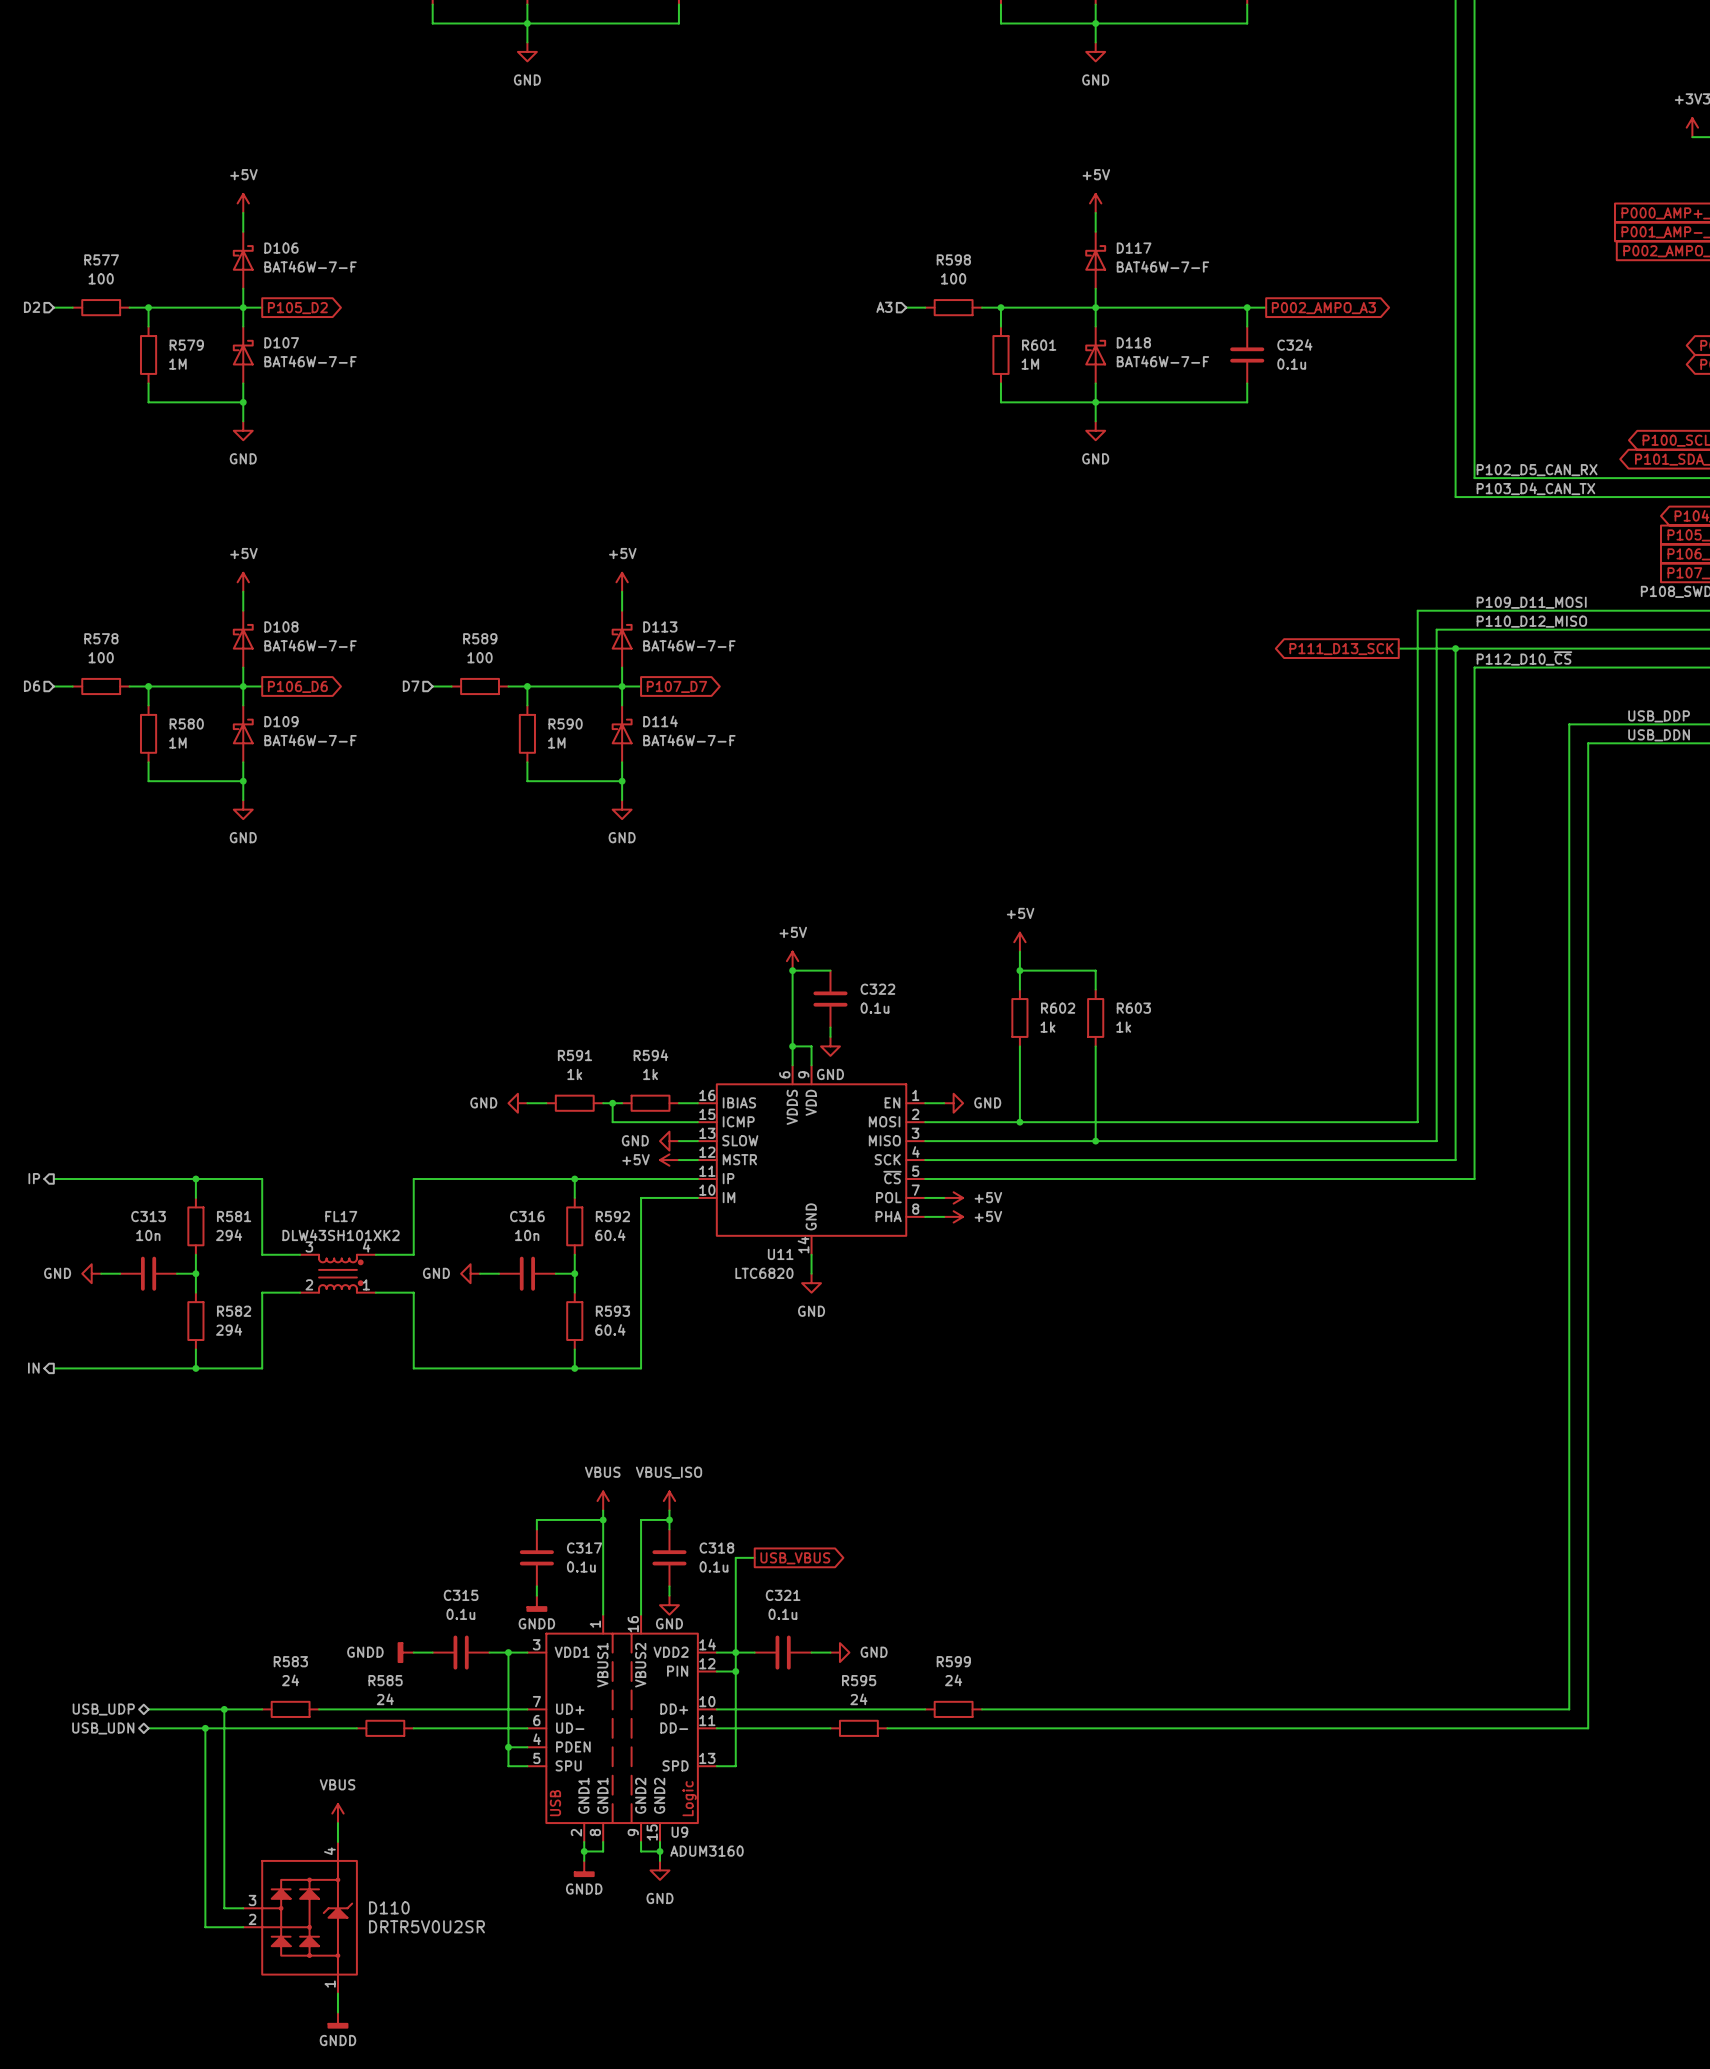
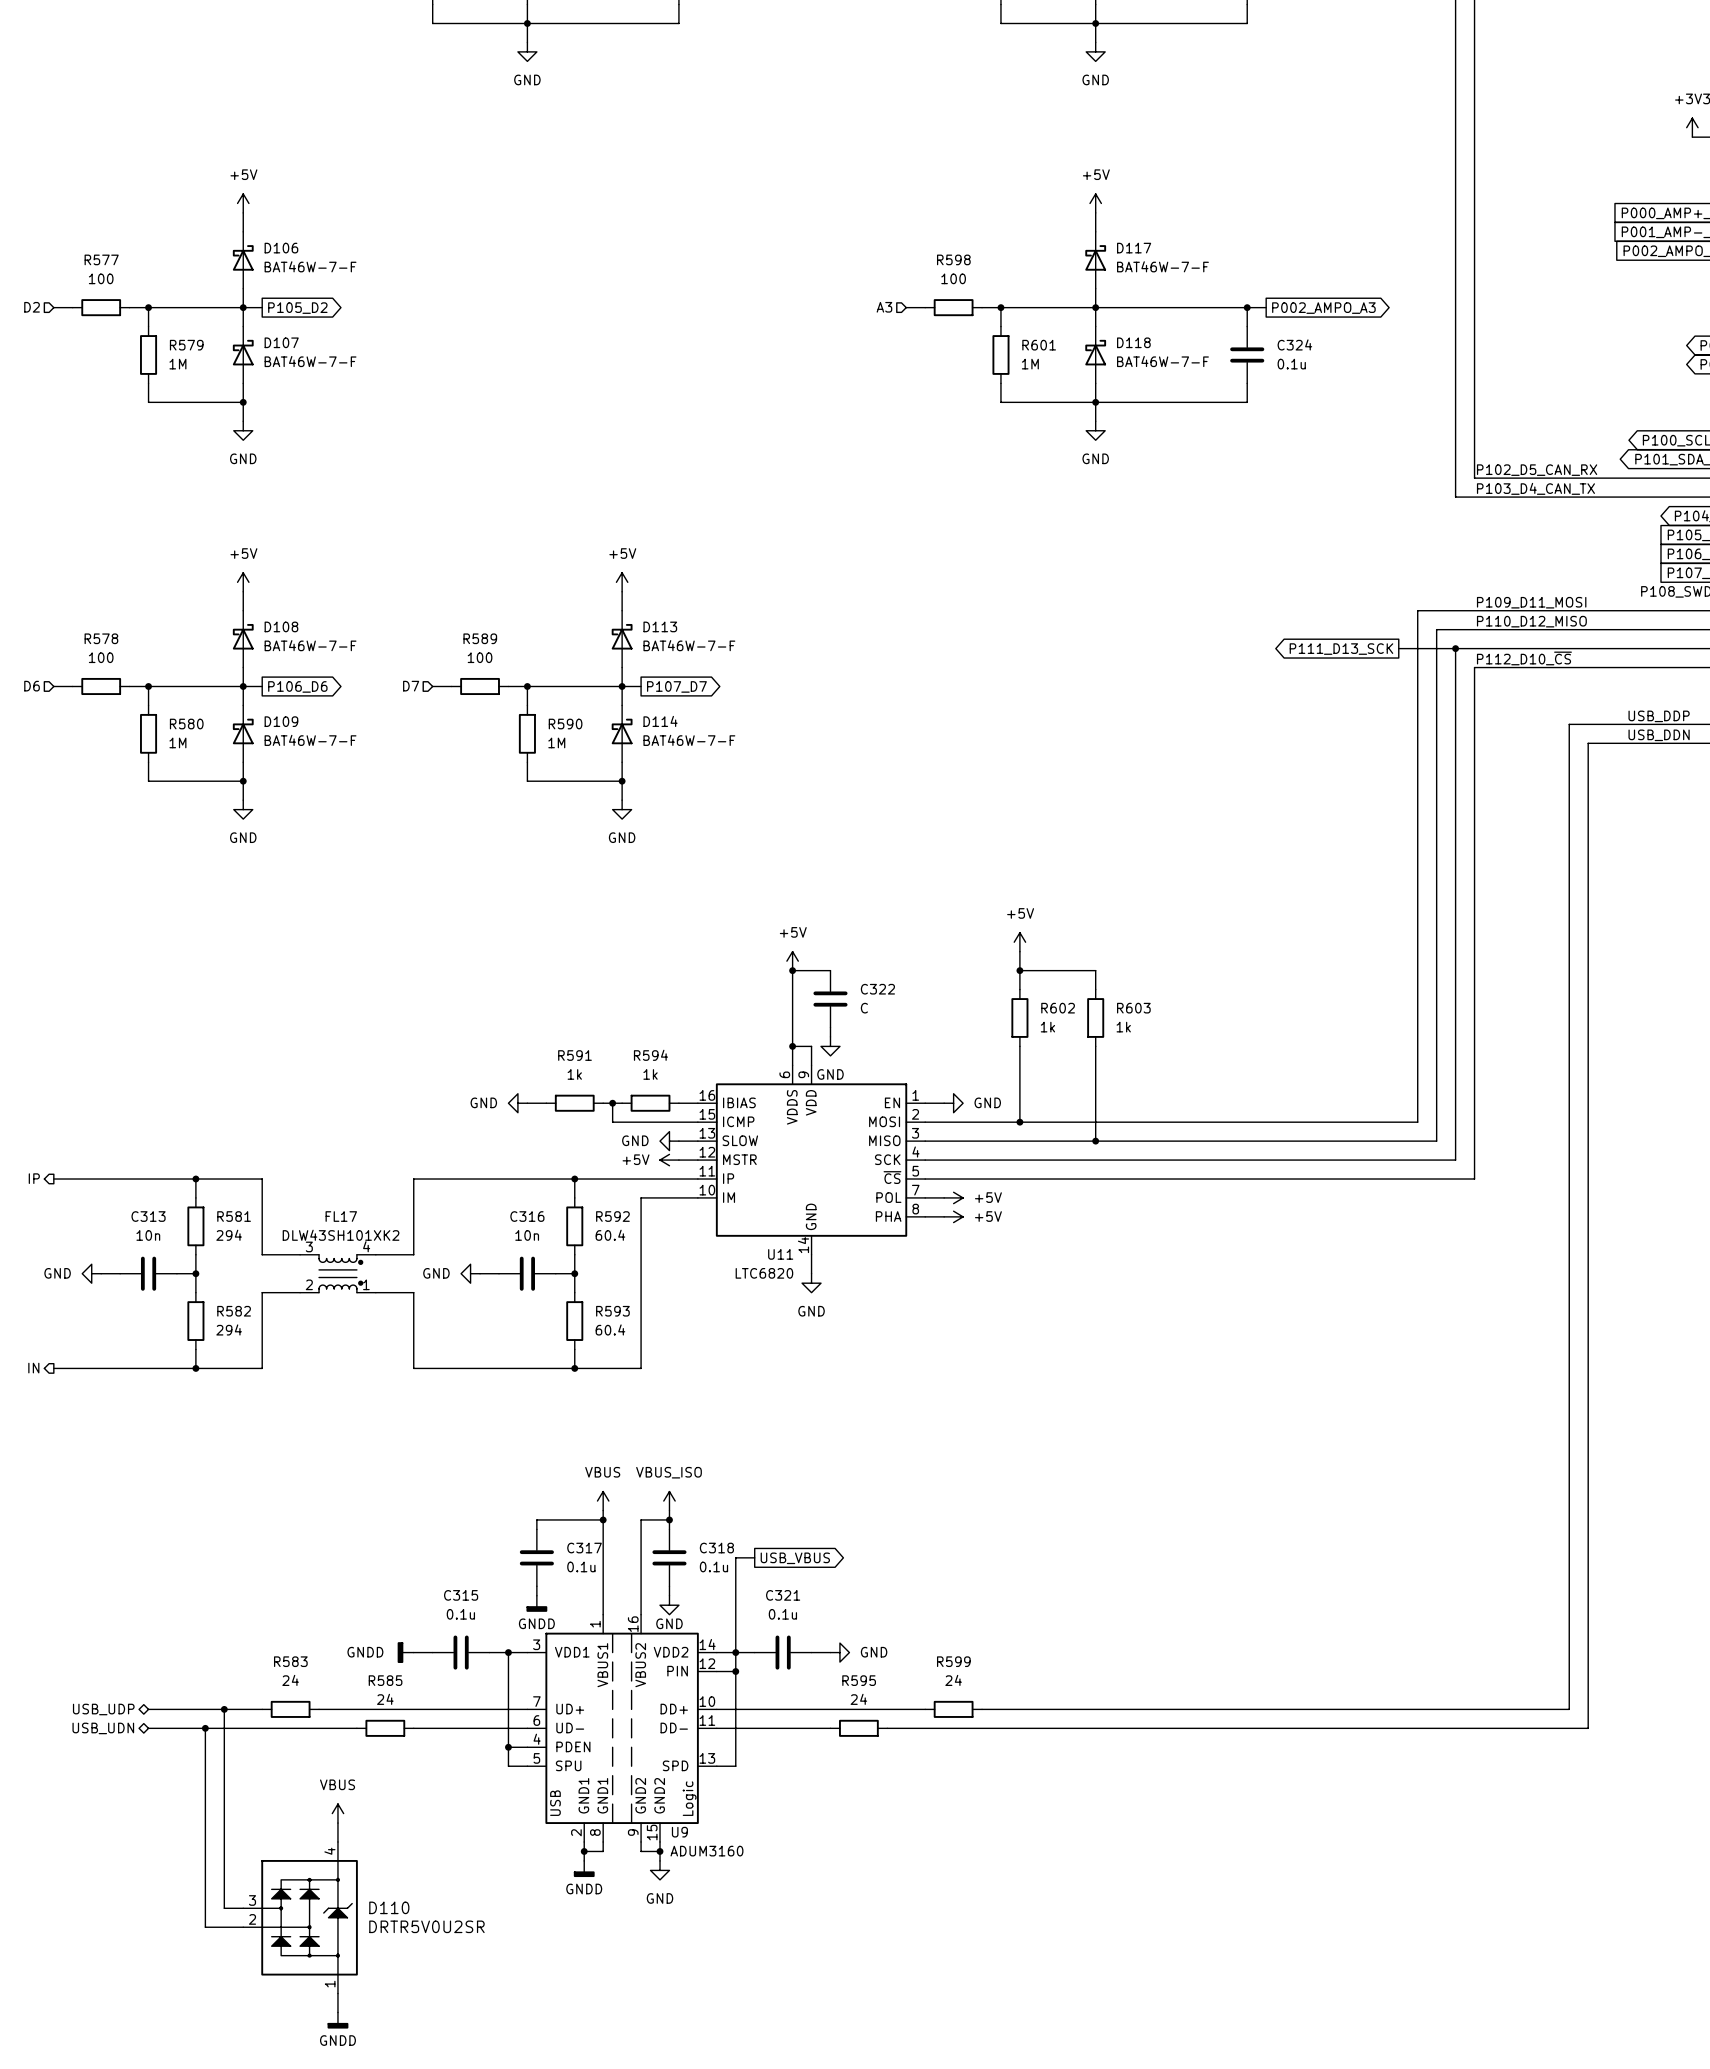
C322 value: 0.1u (874, 1008) -> C (864, 1008)

